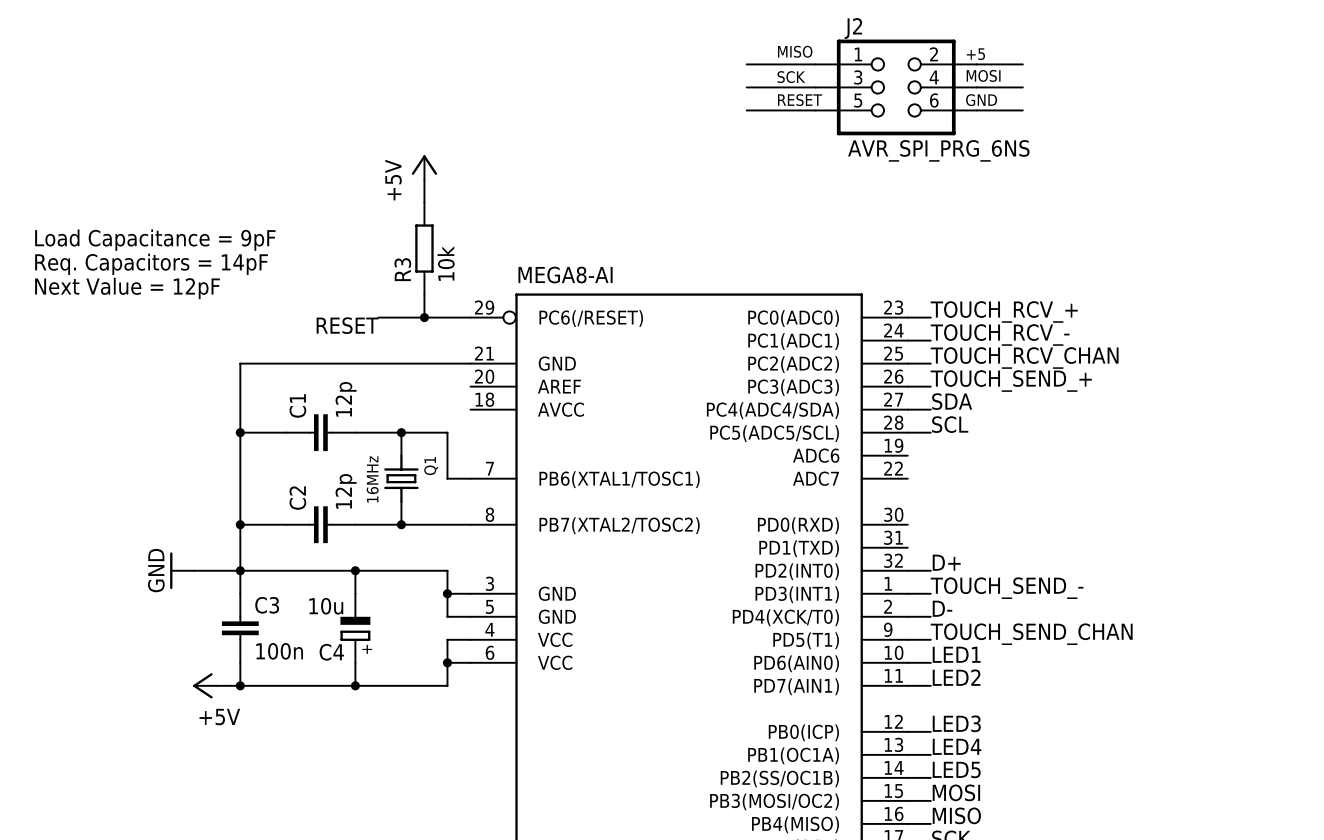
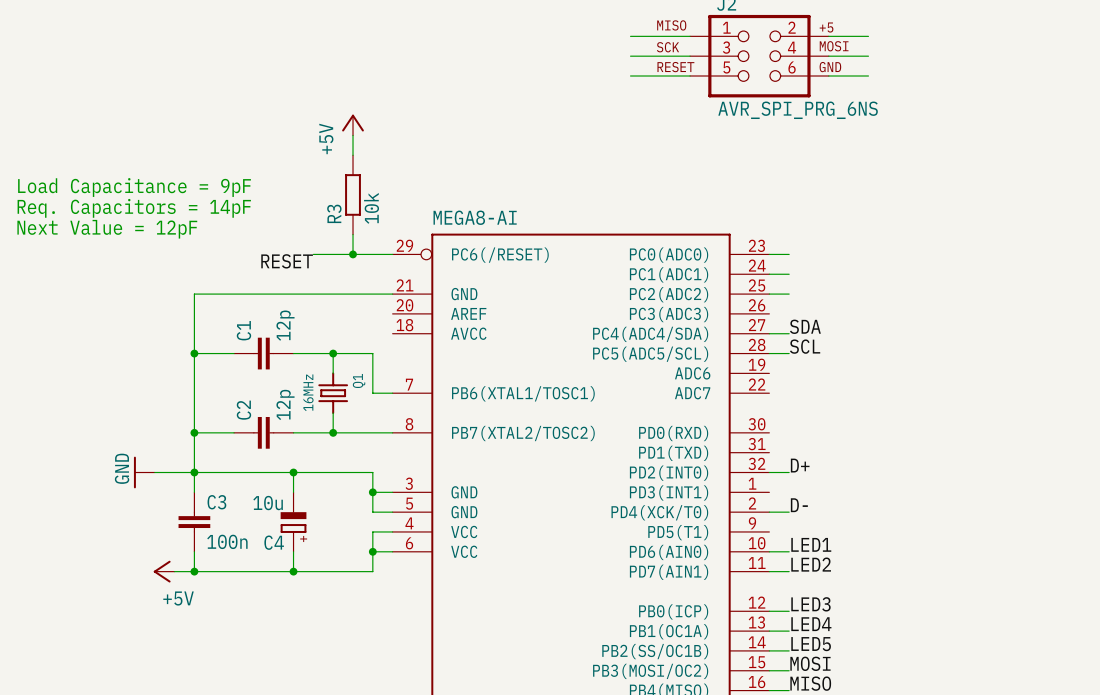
label: TOUCH_RCV_+ (1004, 311) -> none
label: TOUCH_RCV_- (1000, 335) -> none
label: TOUCH_RCV_CHAN (1024, 358) -> none
label: TOUCH_SEND_+ (1011, 381) -> none
wire: (907, 386) (930, 386) -> none
label: TOUCH_SEND_- (1007, 588) -> none
wire: (907, 593) (930, 593) -> none
label: TOUCH_SEND_CHAN (1031, 634) -> none
wire: (907, 639) (930, 639) -> none

